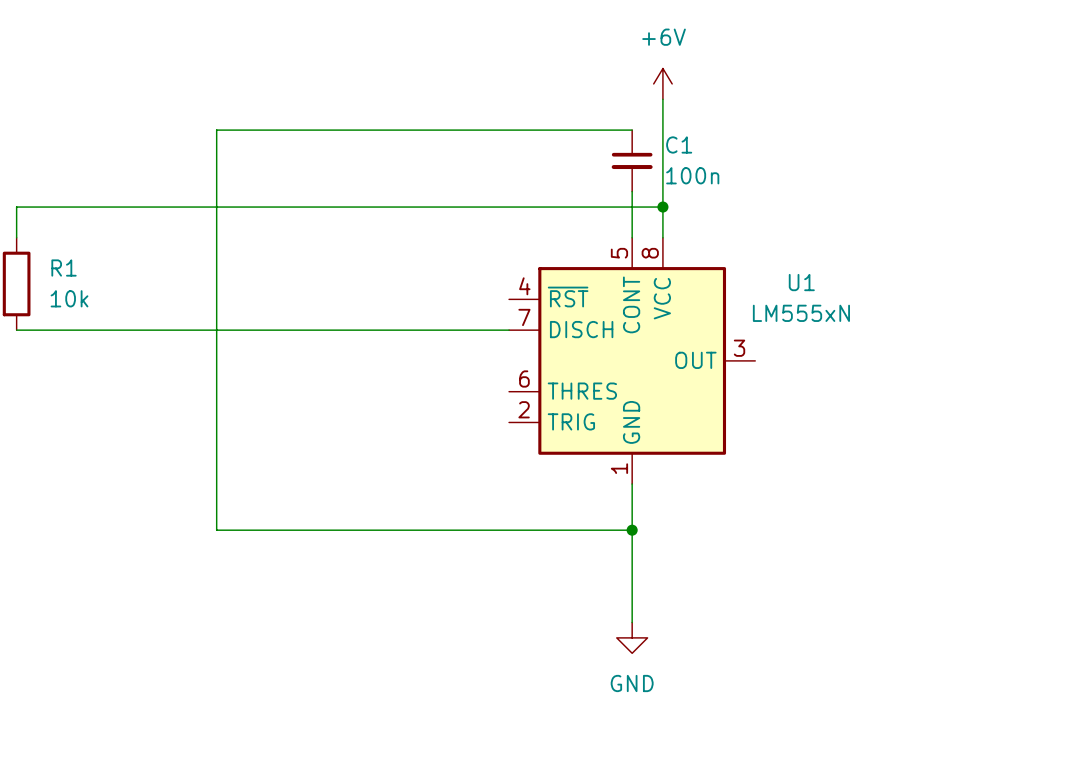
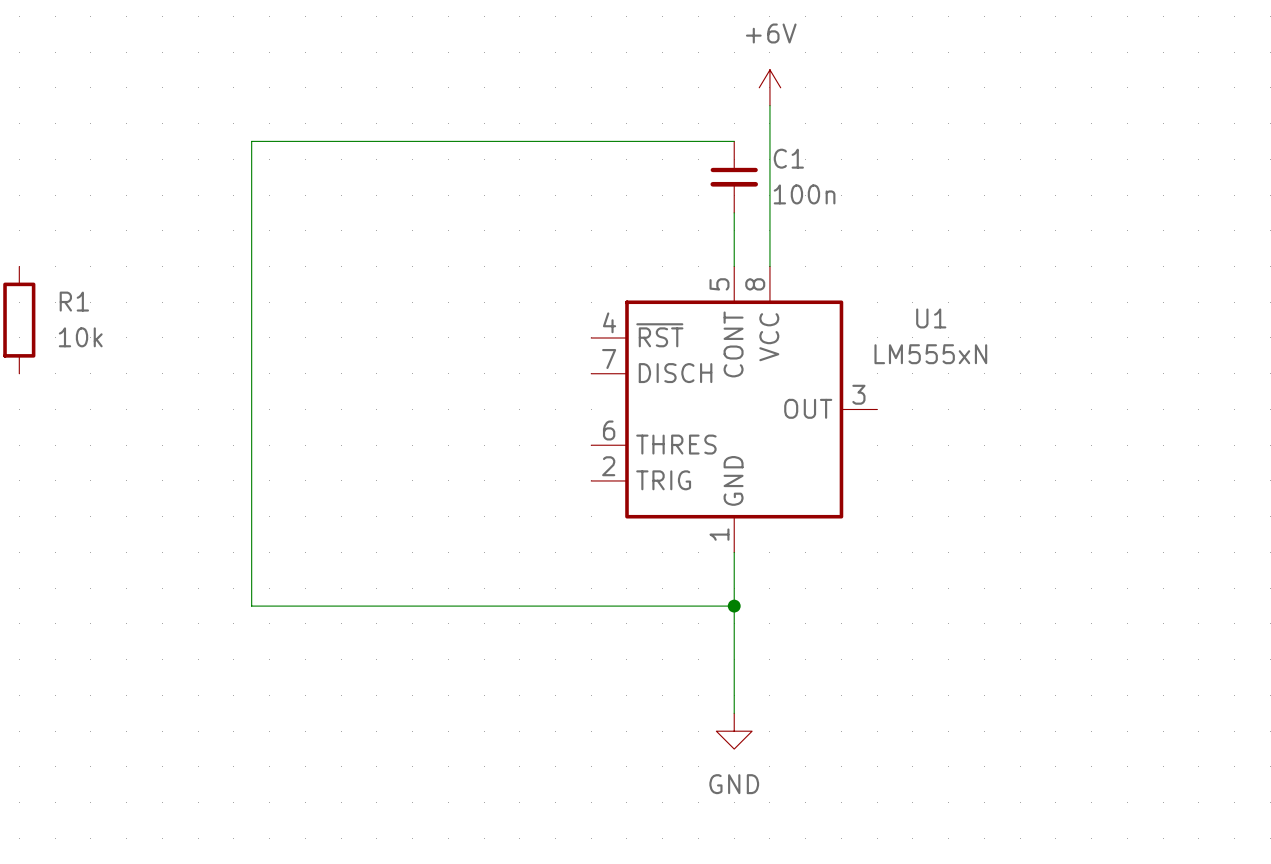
wire: (662, 207) (16, 207) (16, 237) -> none
junction: (662, 207) -> none
wire: (16, 330) (509, 330) -> none

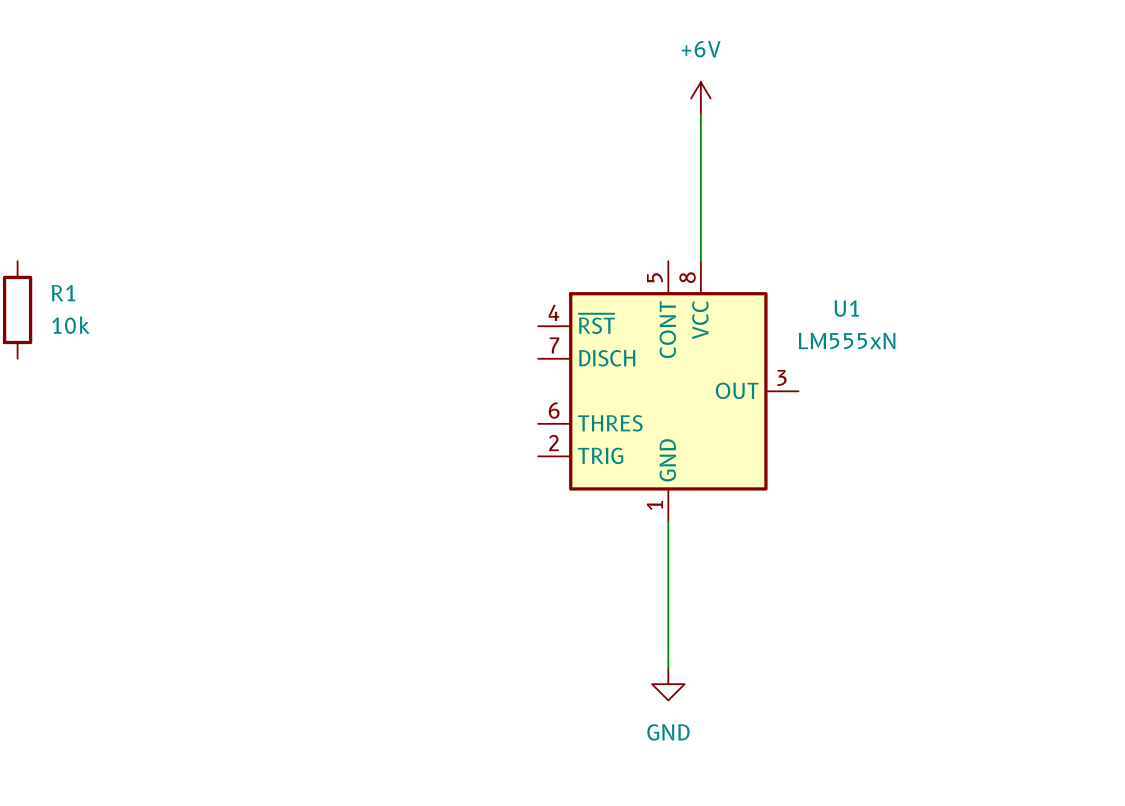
wire: (734, 141) (251, 141) (251, 606) (734, 606) -> none
C1: 100n (734, 177) -> none
wire: (734, 212) (734, 266) -> none
junction: (734, 606) -> none

